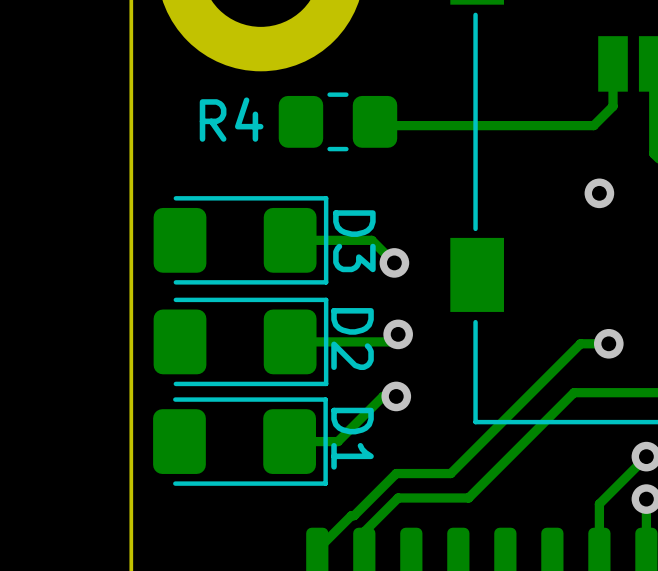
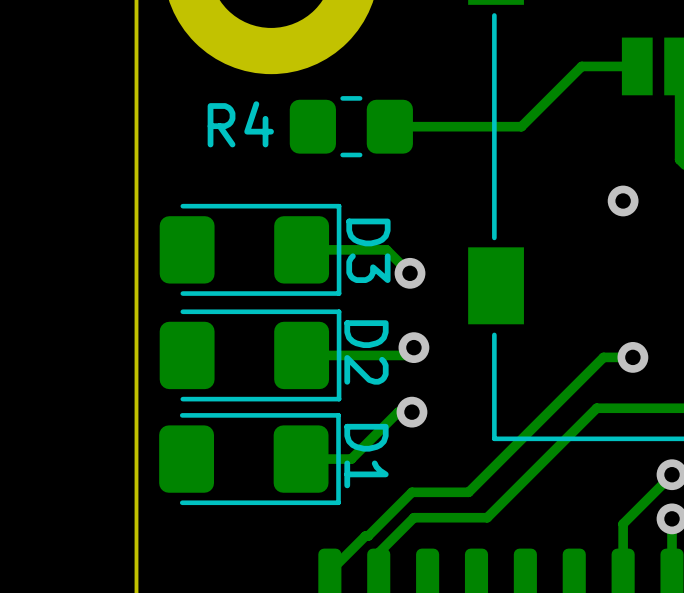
track: (613, 63) (613, 106) (593, 125) (378, 125) (375, 121) -> (637, 66) (581, 66) (521, 126) (389, 126)

